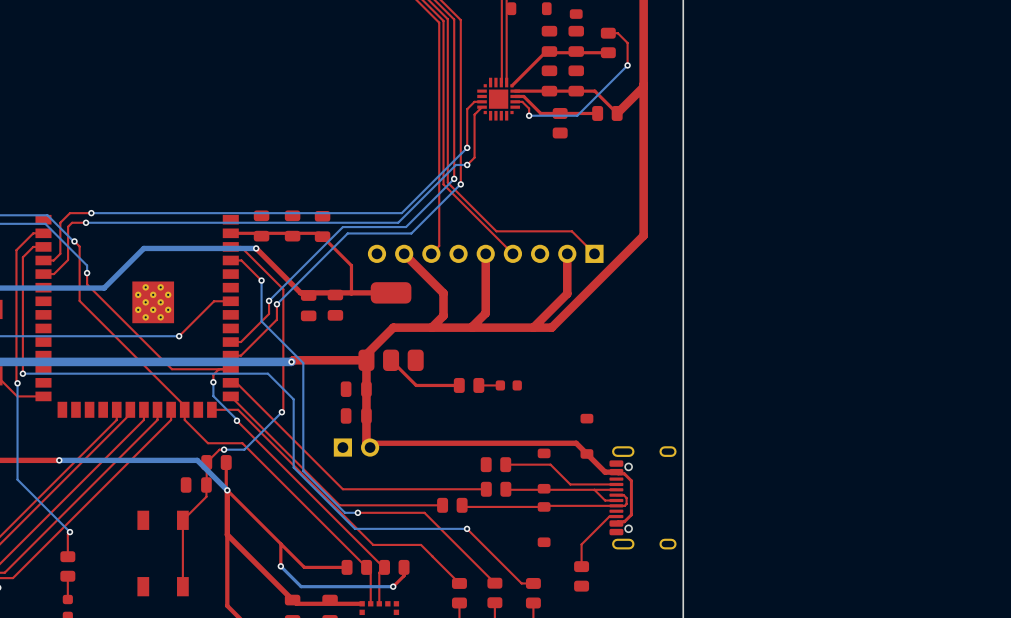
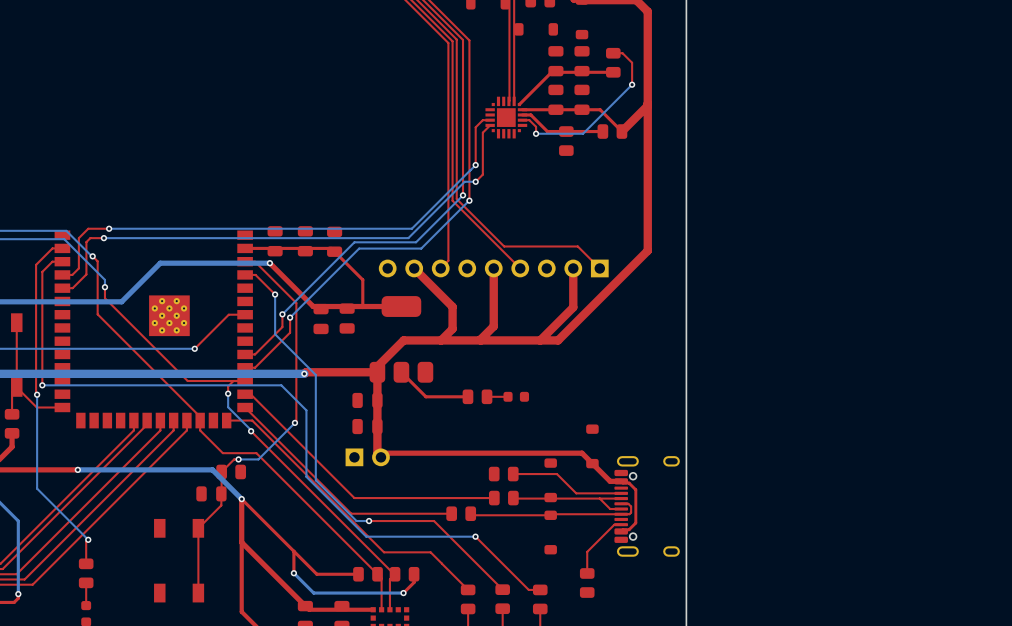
top track: (226, 462) (227, 490) -> none

